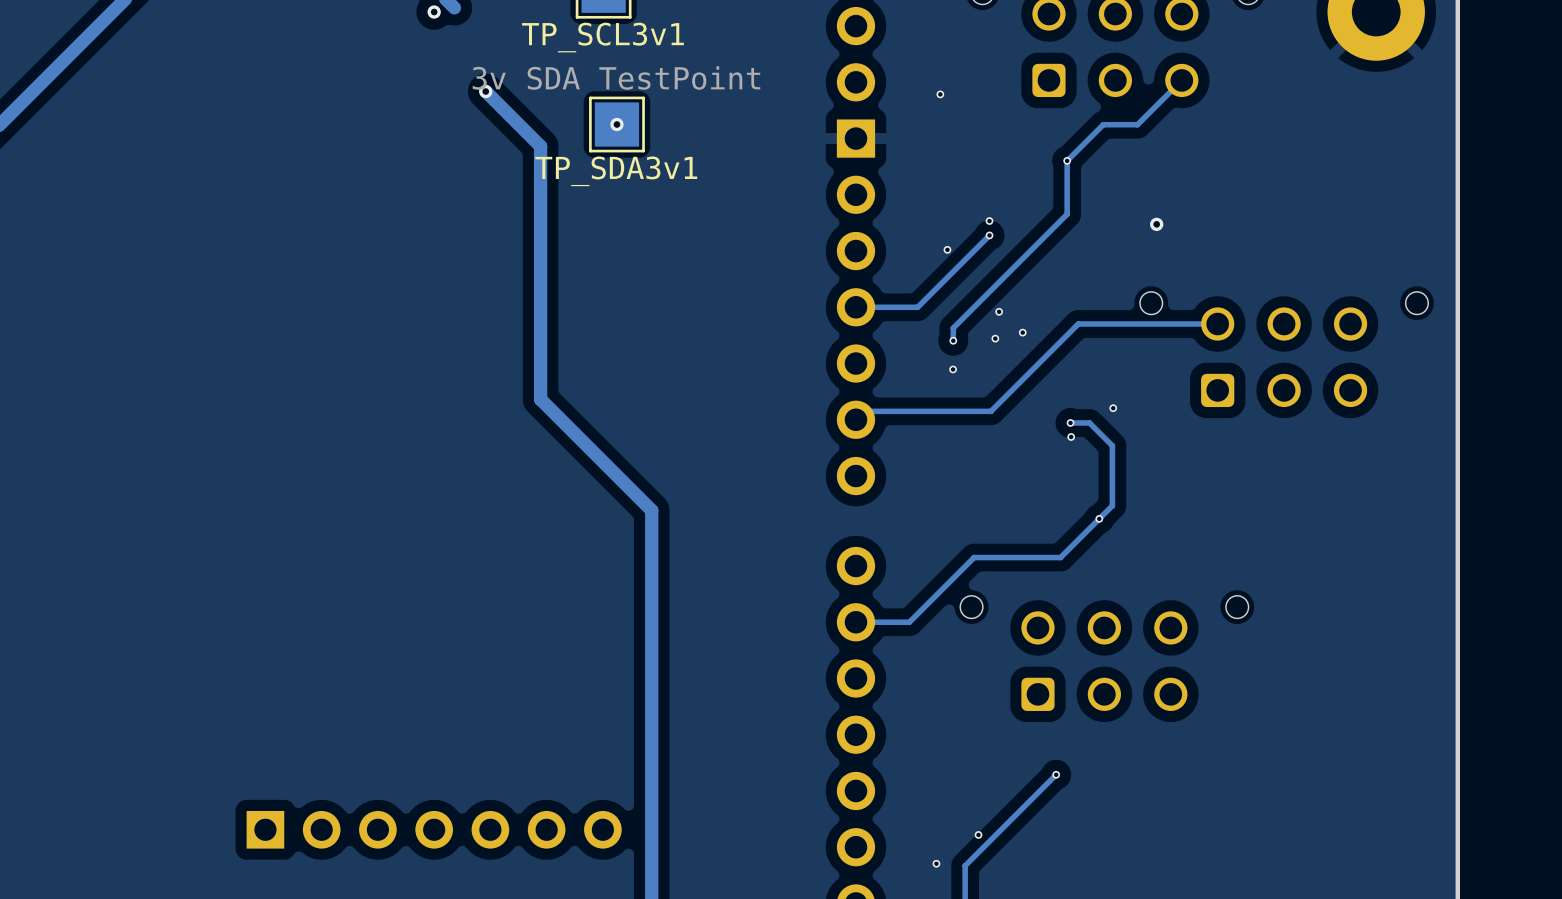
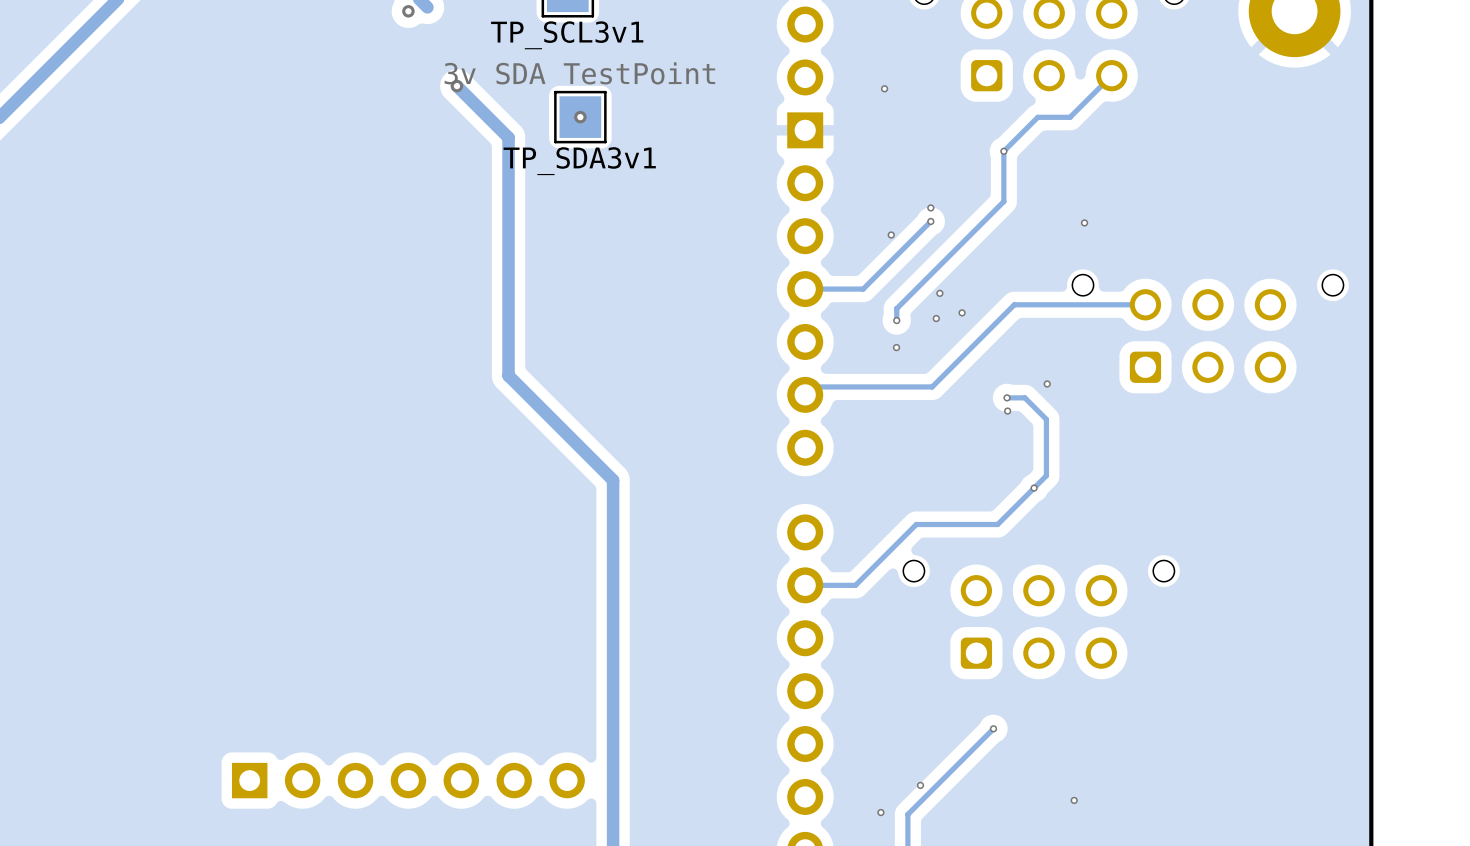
via: (1156, 224) -> none
via: none -> (1084, 222)
via: none -> (1074, 800)

